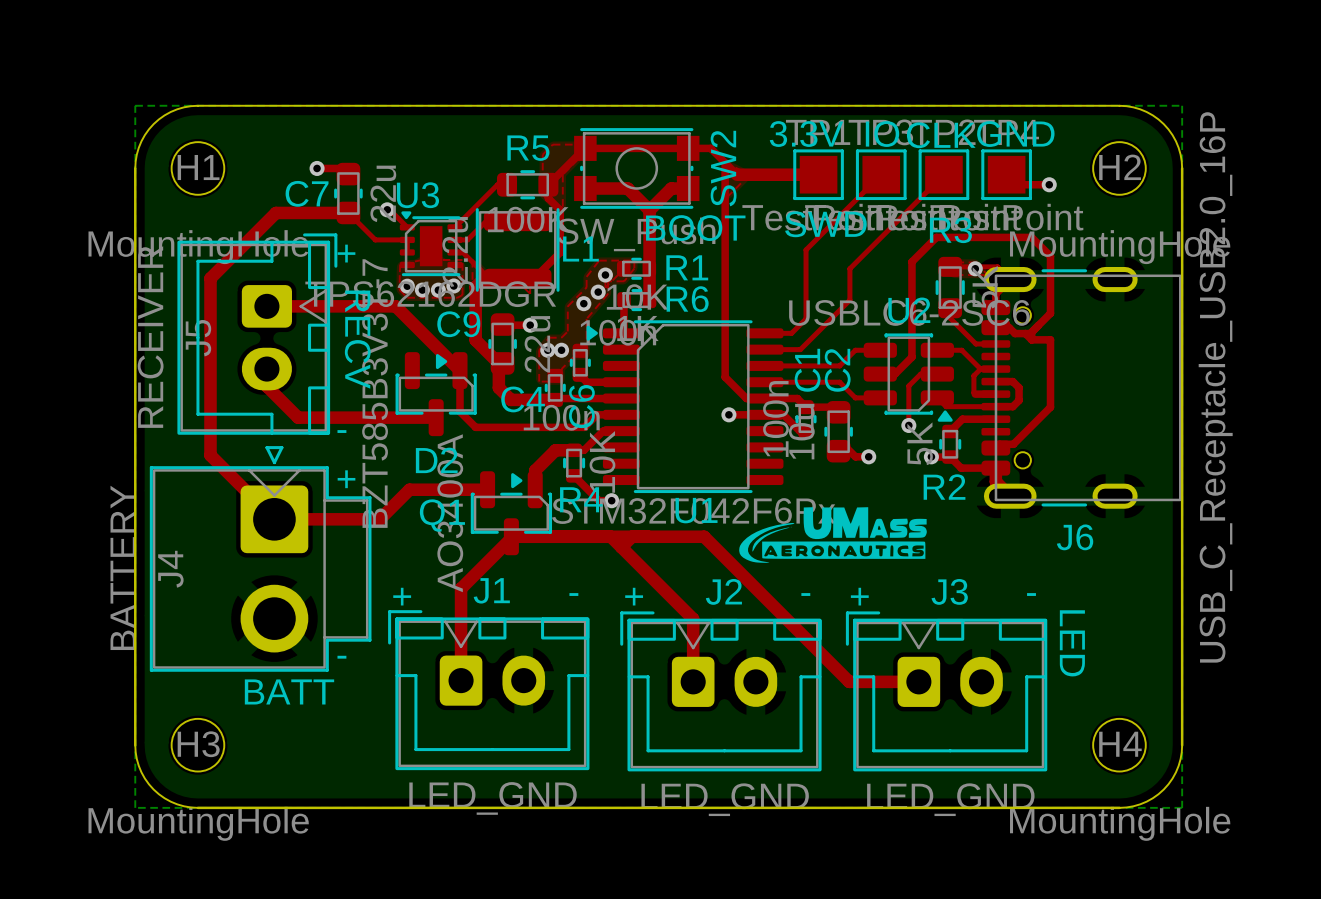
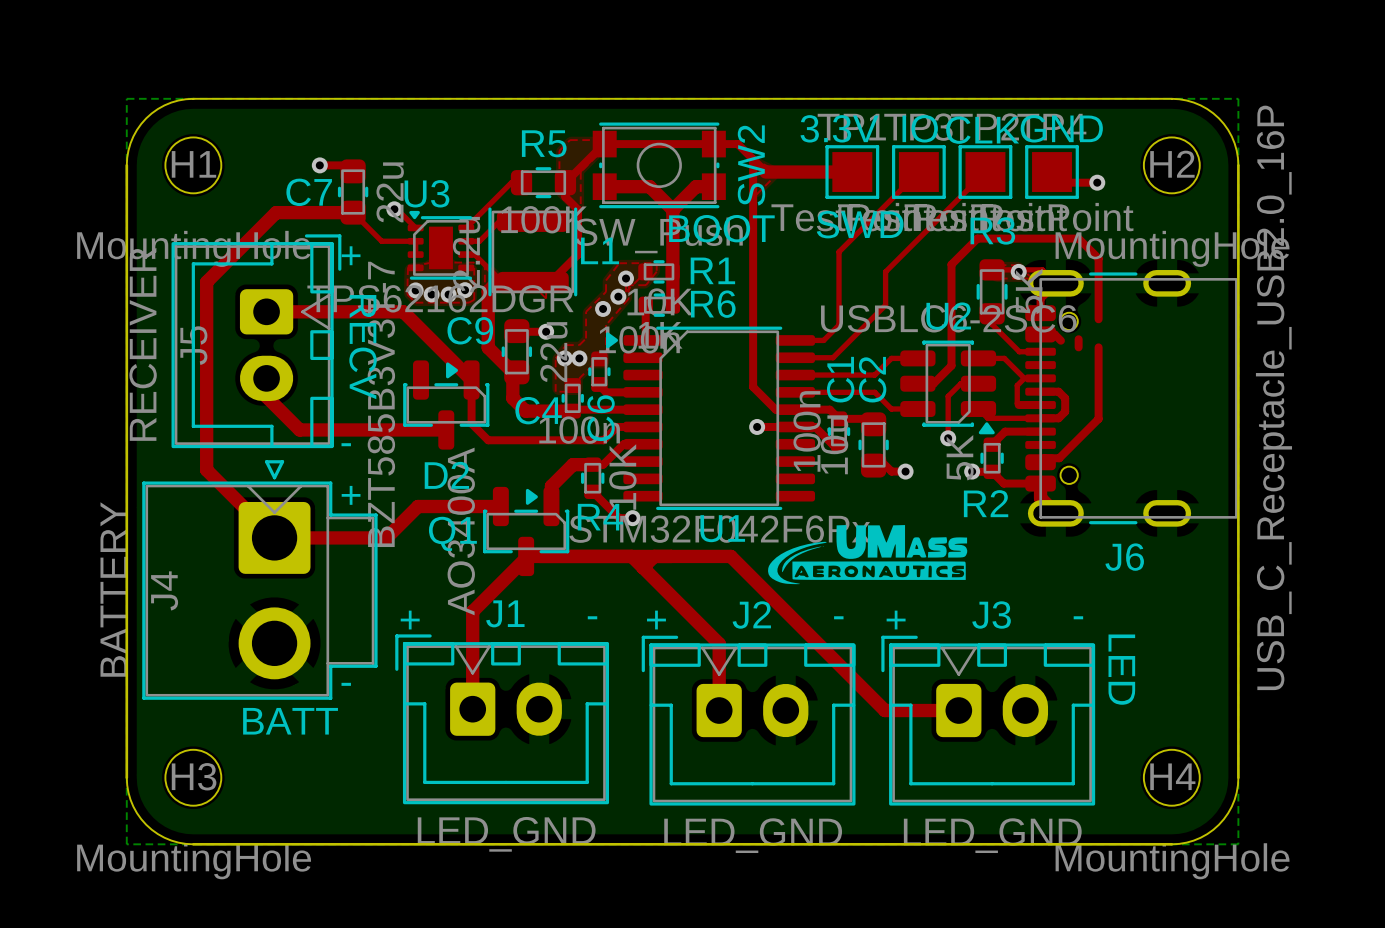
top track: (1050, 313) (1030, 333) (1015, 333) -> none
top track: (1025, 333) (1031, 339) (1050, 339) -> none

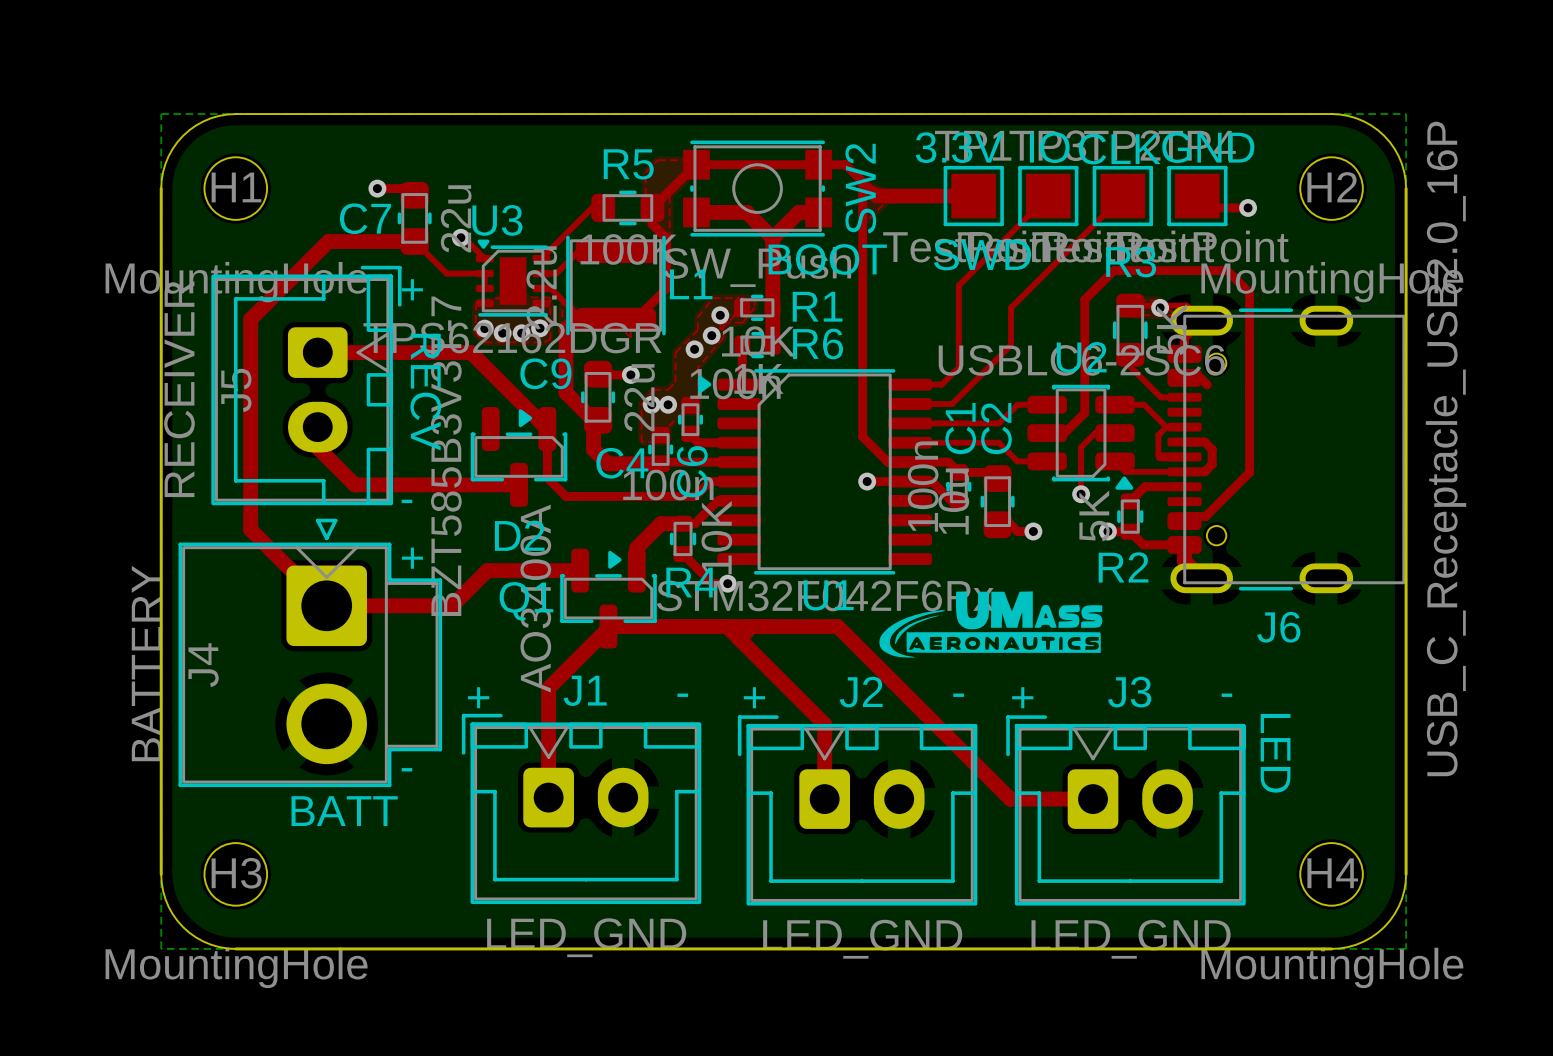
top track: none -> (1249, 360) (1249, 392)
top track: (1078, 339) (1078, 347) -> none

